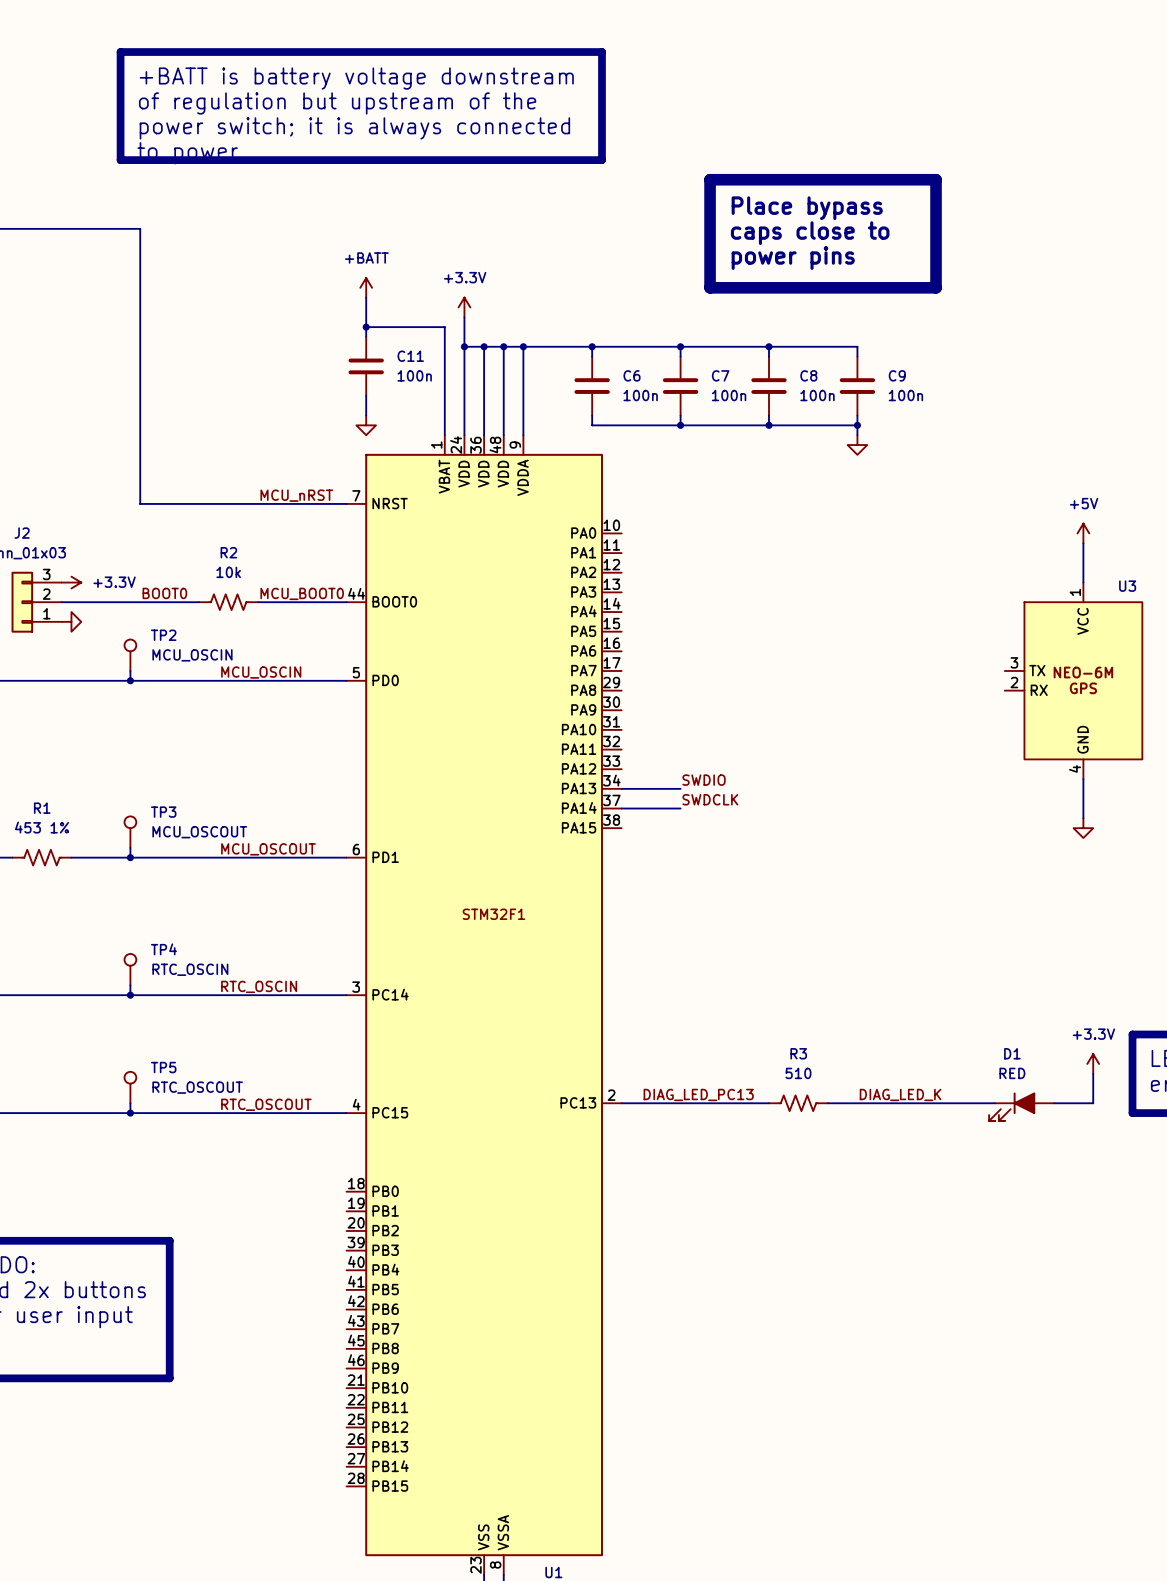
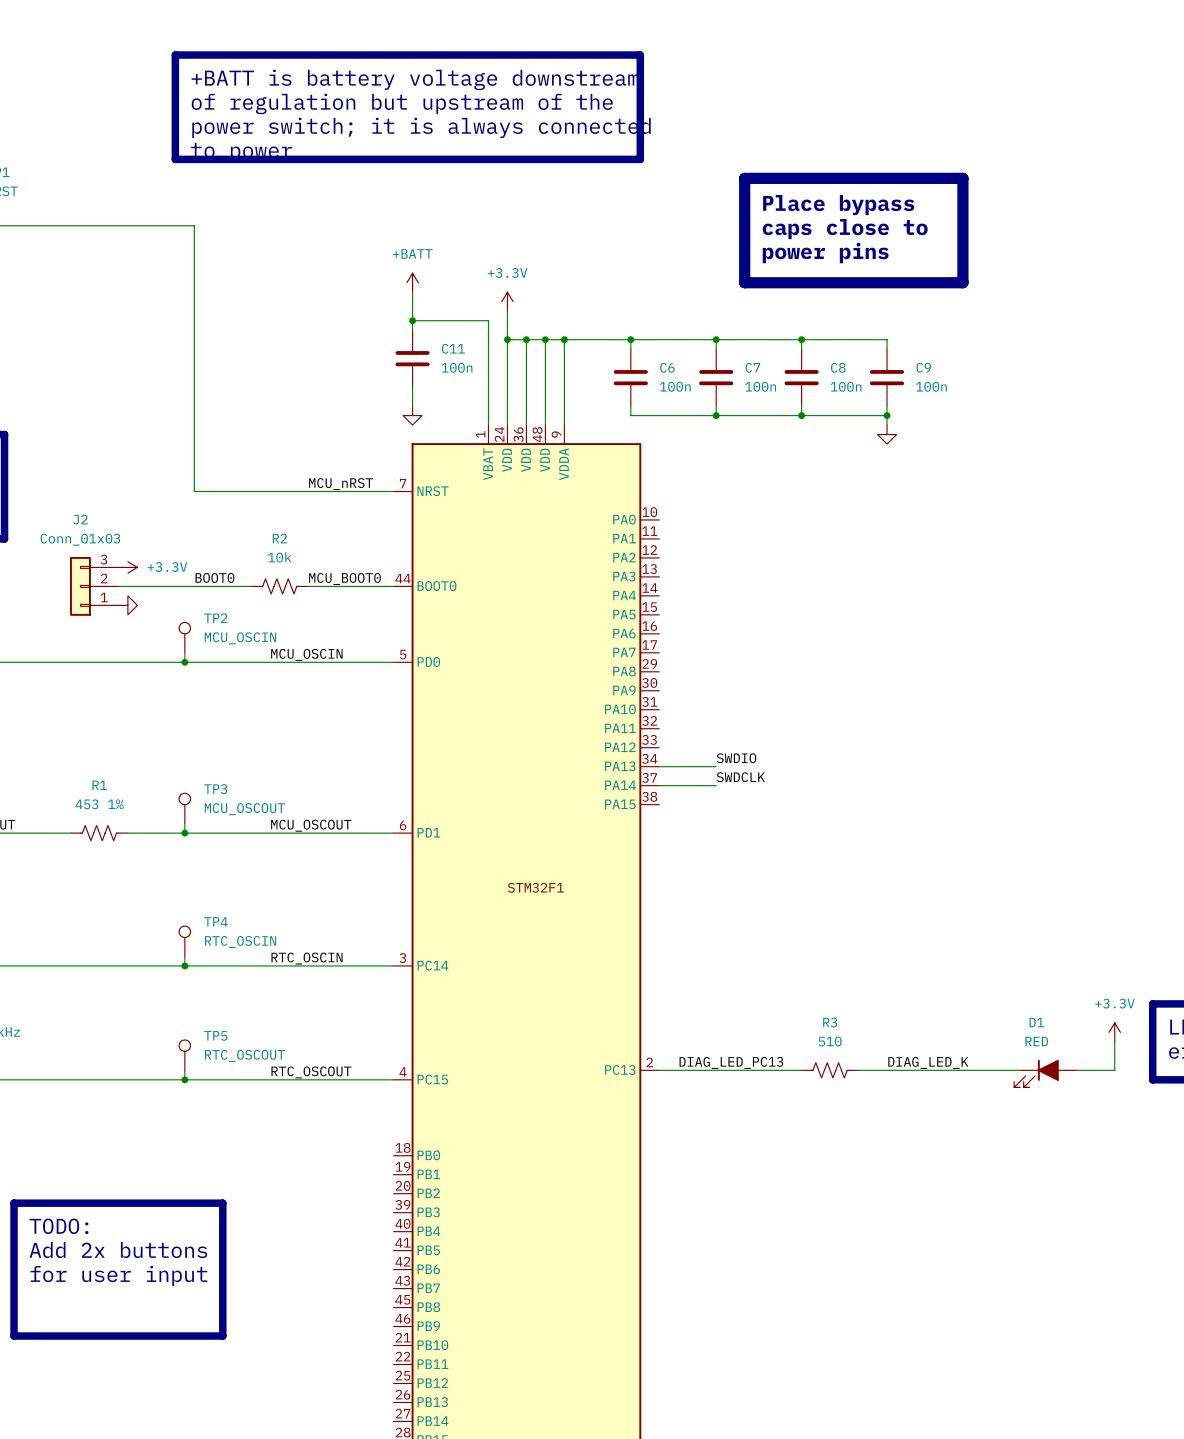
power symbol: +5V (1083, 533) -> none
wire: (1083, 543) (1083, 582) -> none
U3: (1073, 680) -> none
wire: (1083, 779) (1083, 818) -> none
power symbol: (1083, 828) -> none

